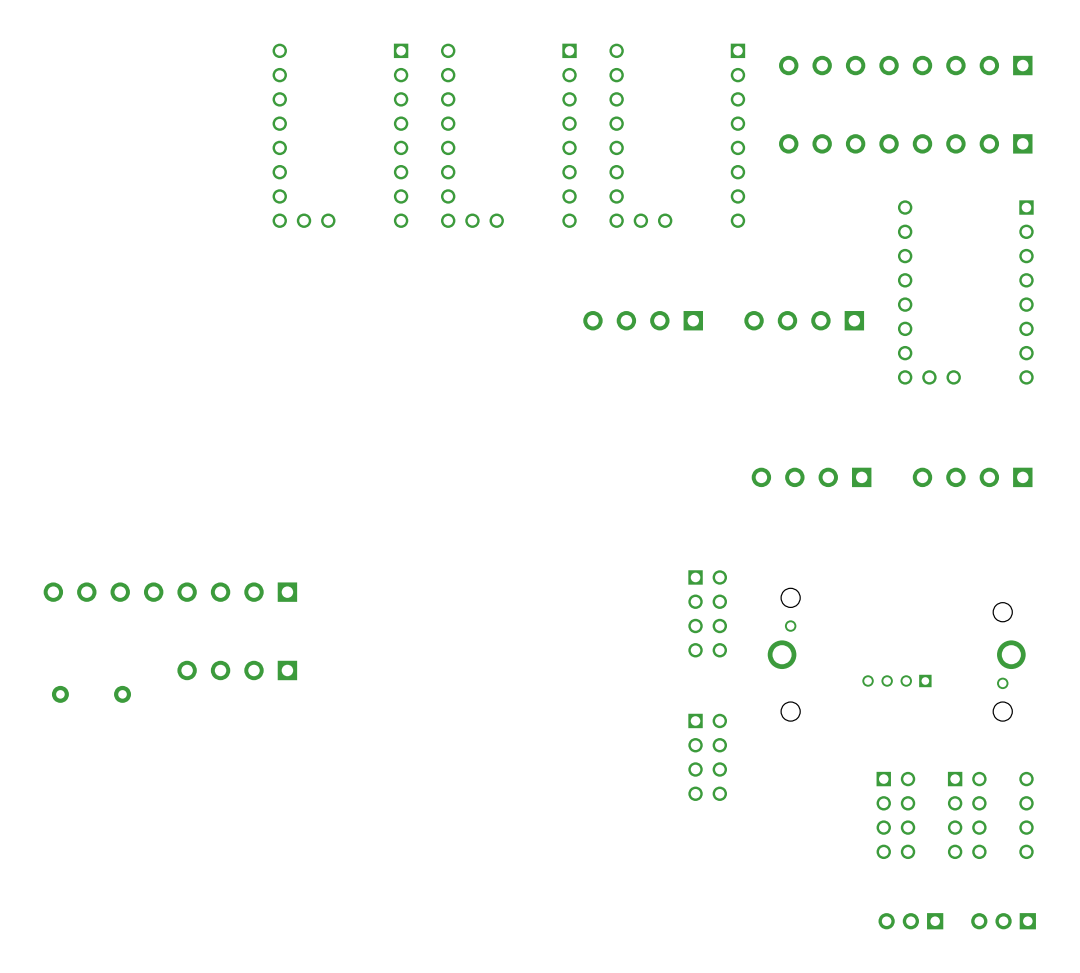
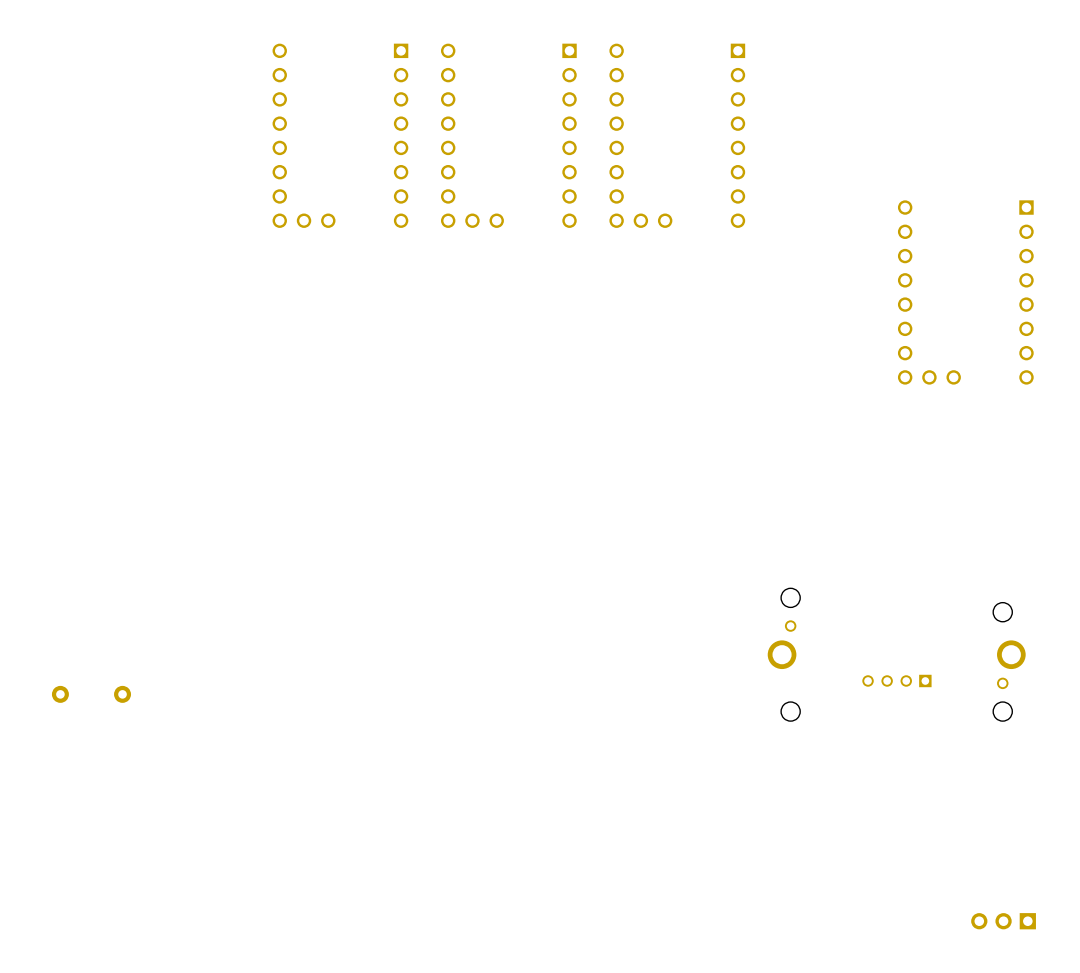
part: (905, 65) -> none
part: (905, 143) -> none
part: (643, 320) -> none
part: (804, 320) -> none
part: (811, 477) -> none
part: (972, 477) -> none
part: (170, 592) -> none
part: (707, 613) -> none
part: (237, 670) -> none
part: (707, 757) -> none
part: (895, 815) -> none
part: (967, 815) -> none
part: (1026, 815) -> none
part: (910, 921) -> none

